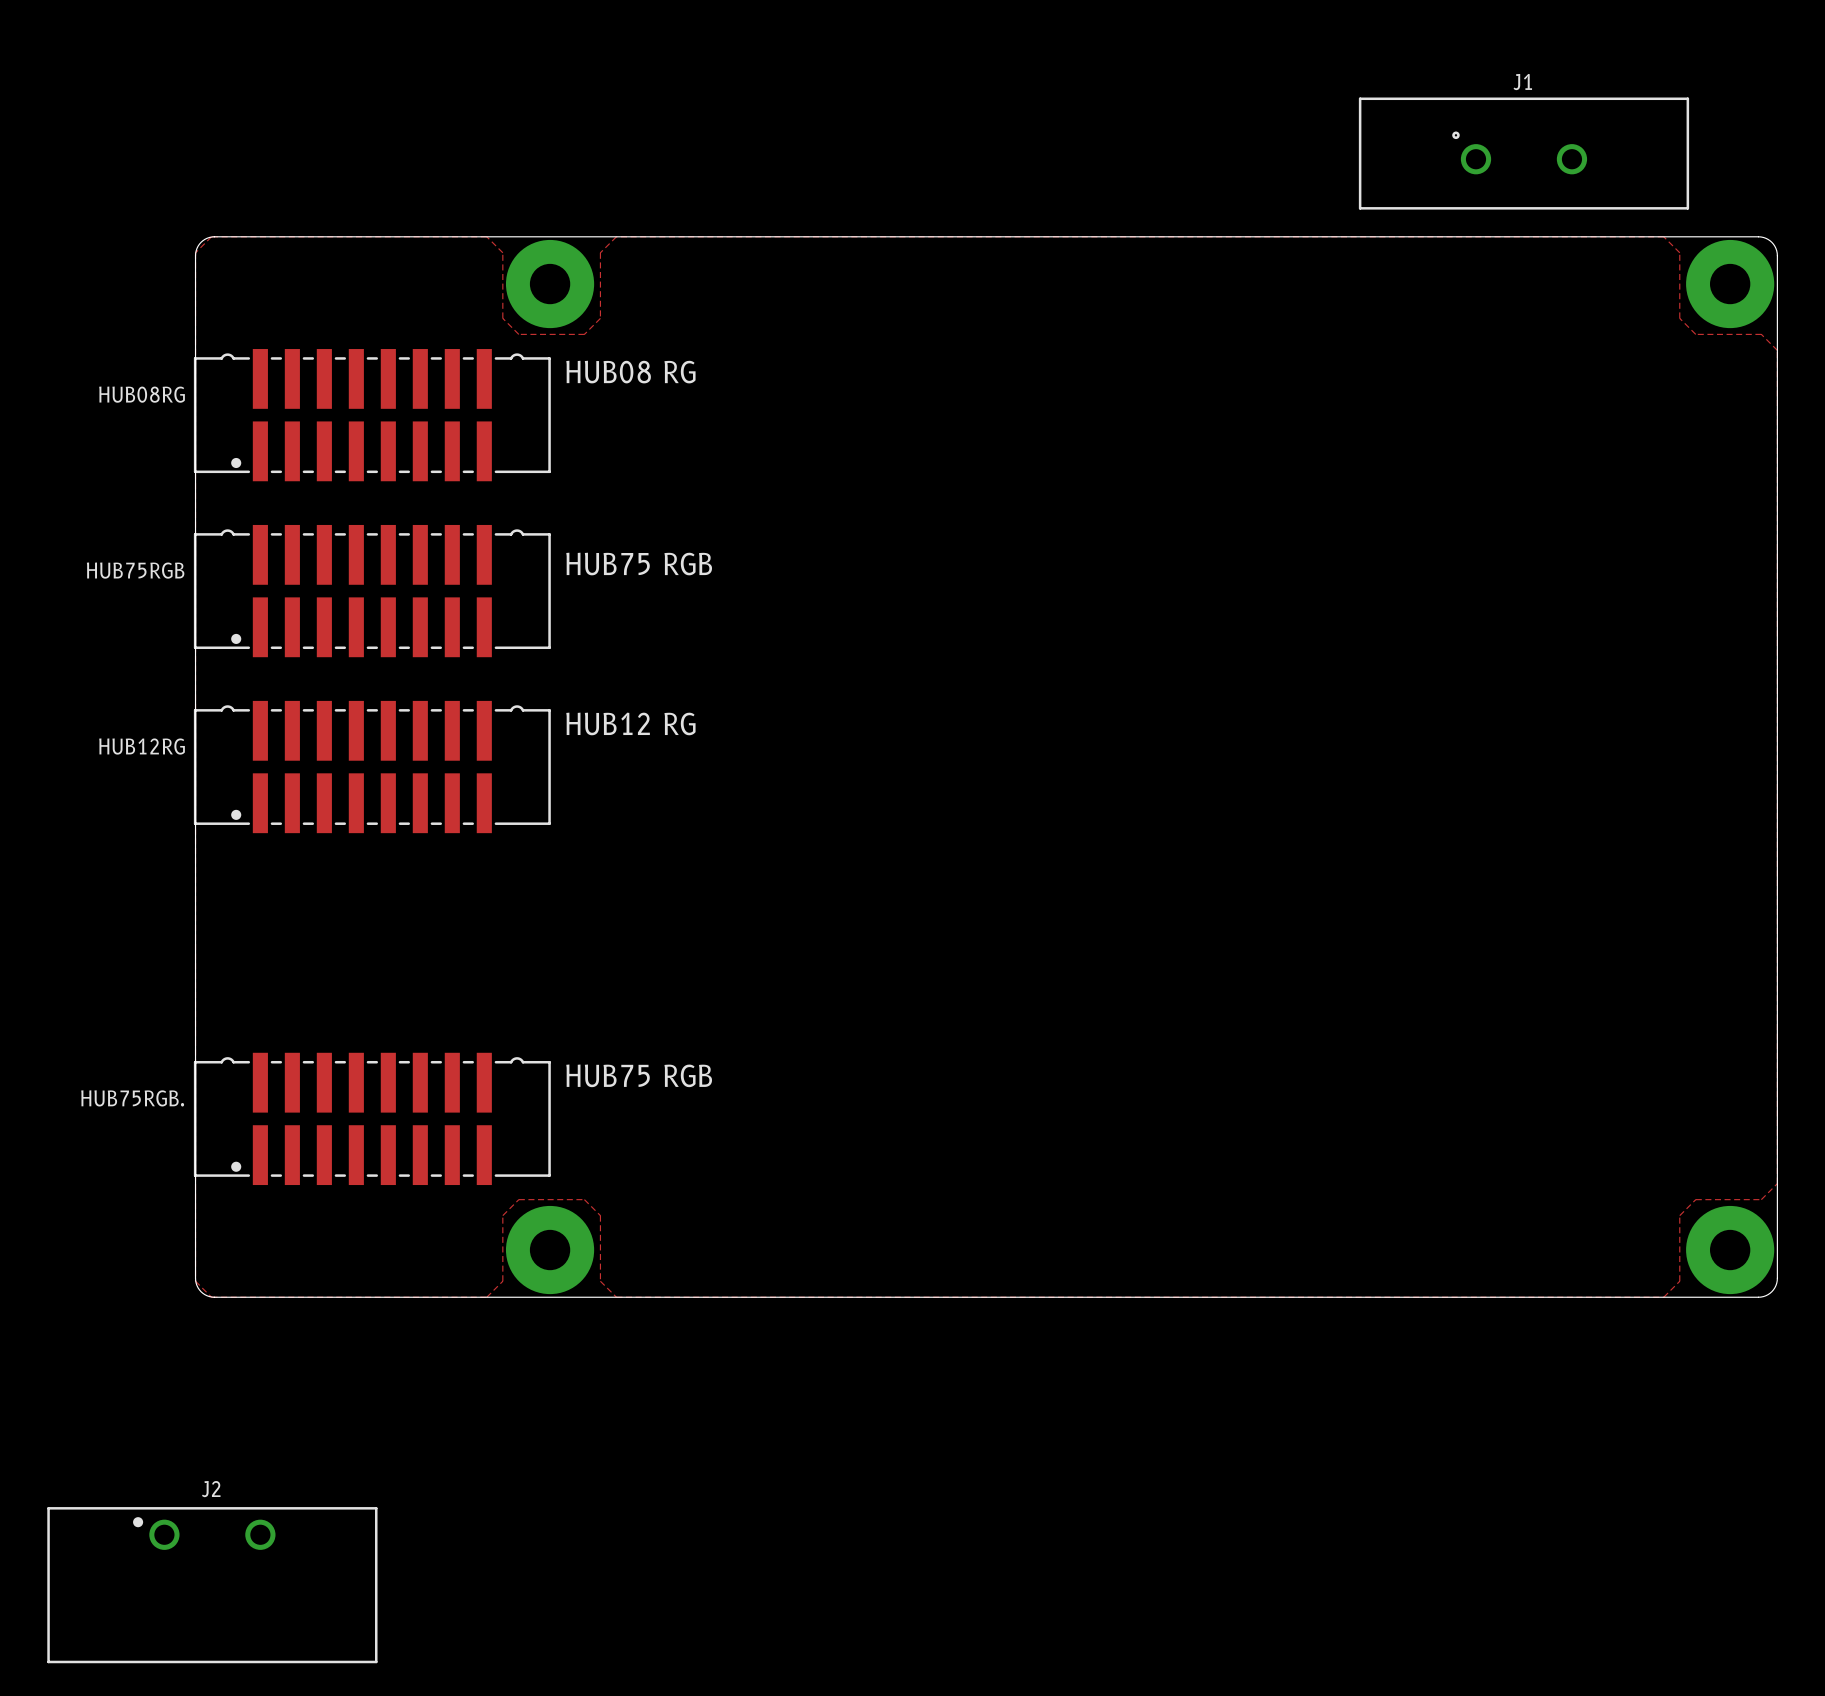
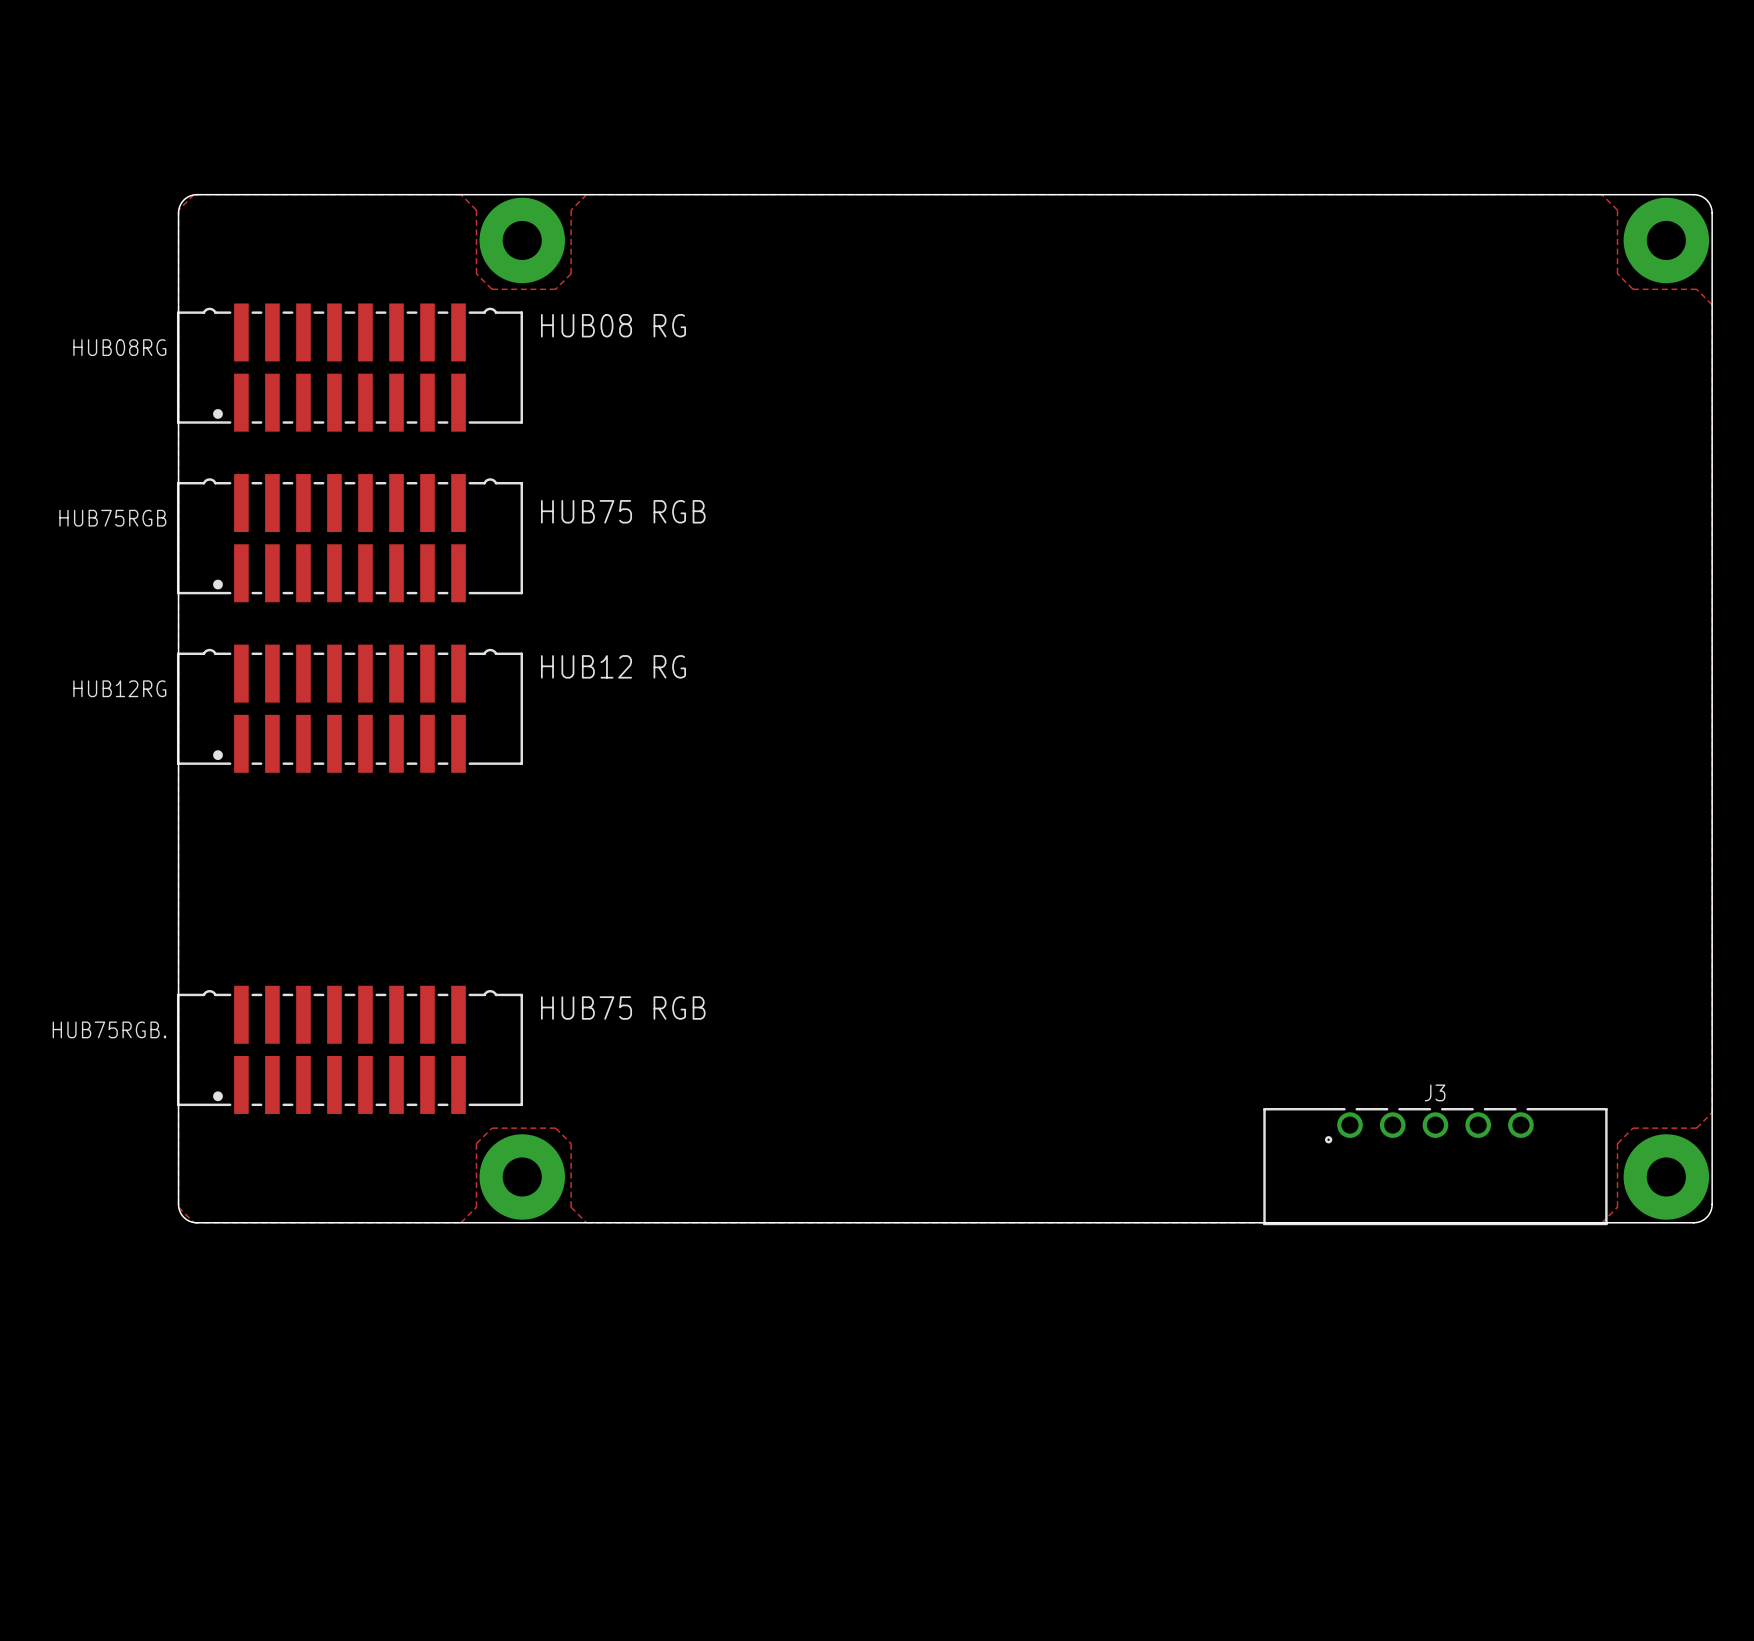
J1: (1523, 153) -> none
J3: none -> (1435, 1166)
J2: (212, 1585) -> none

